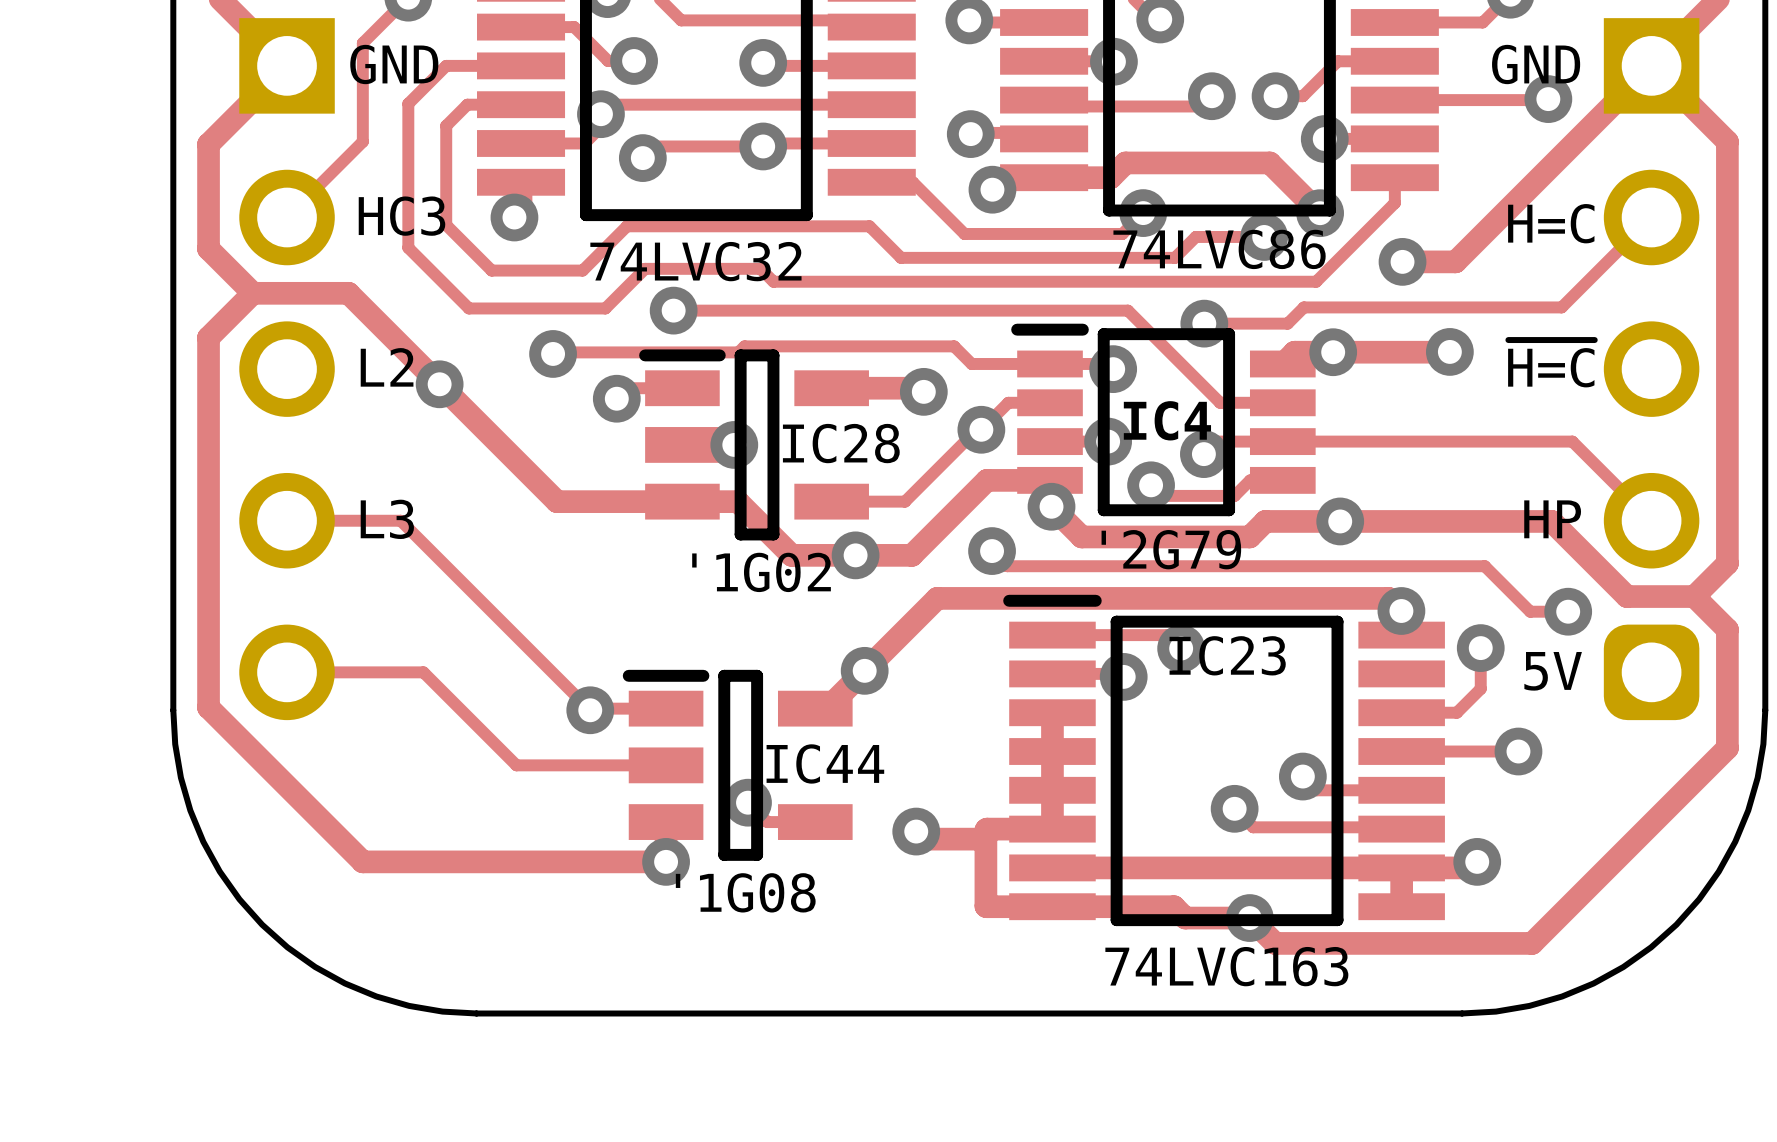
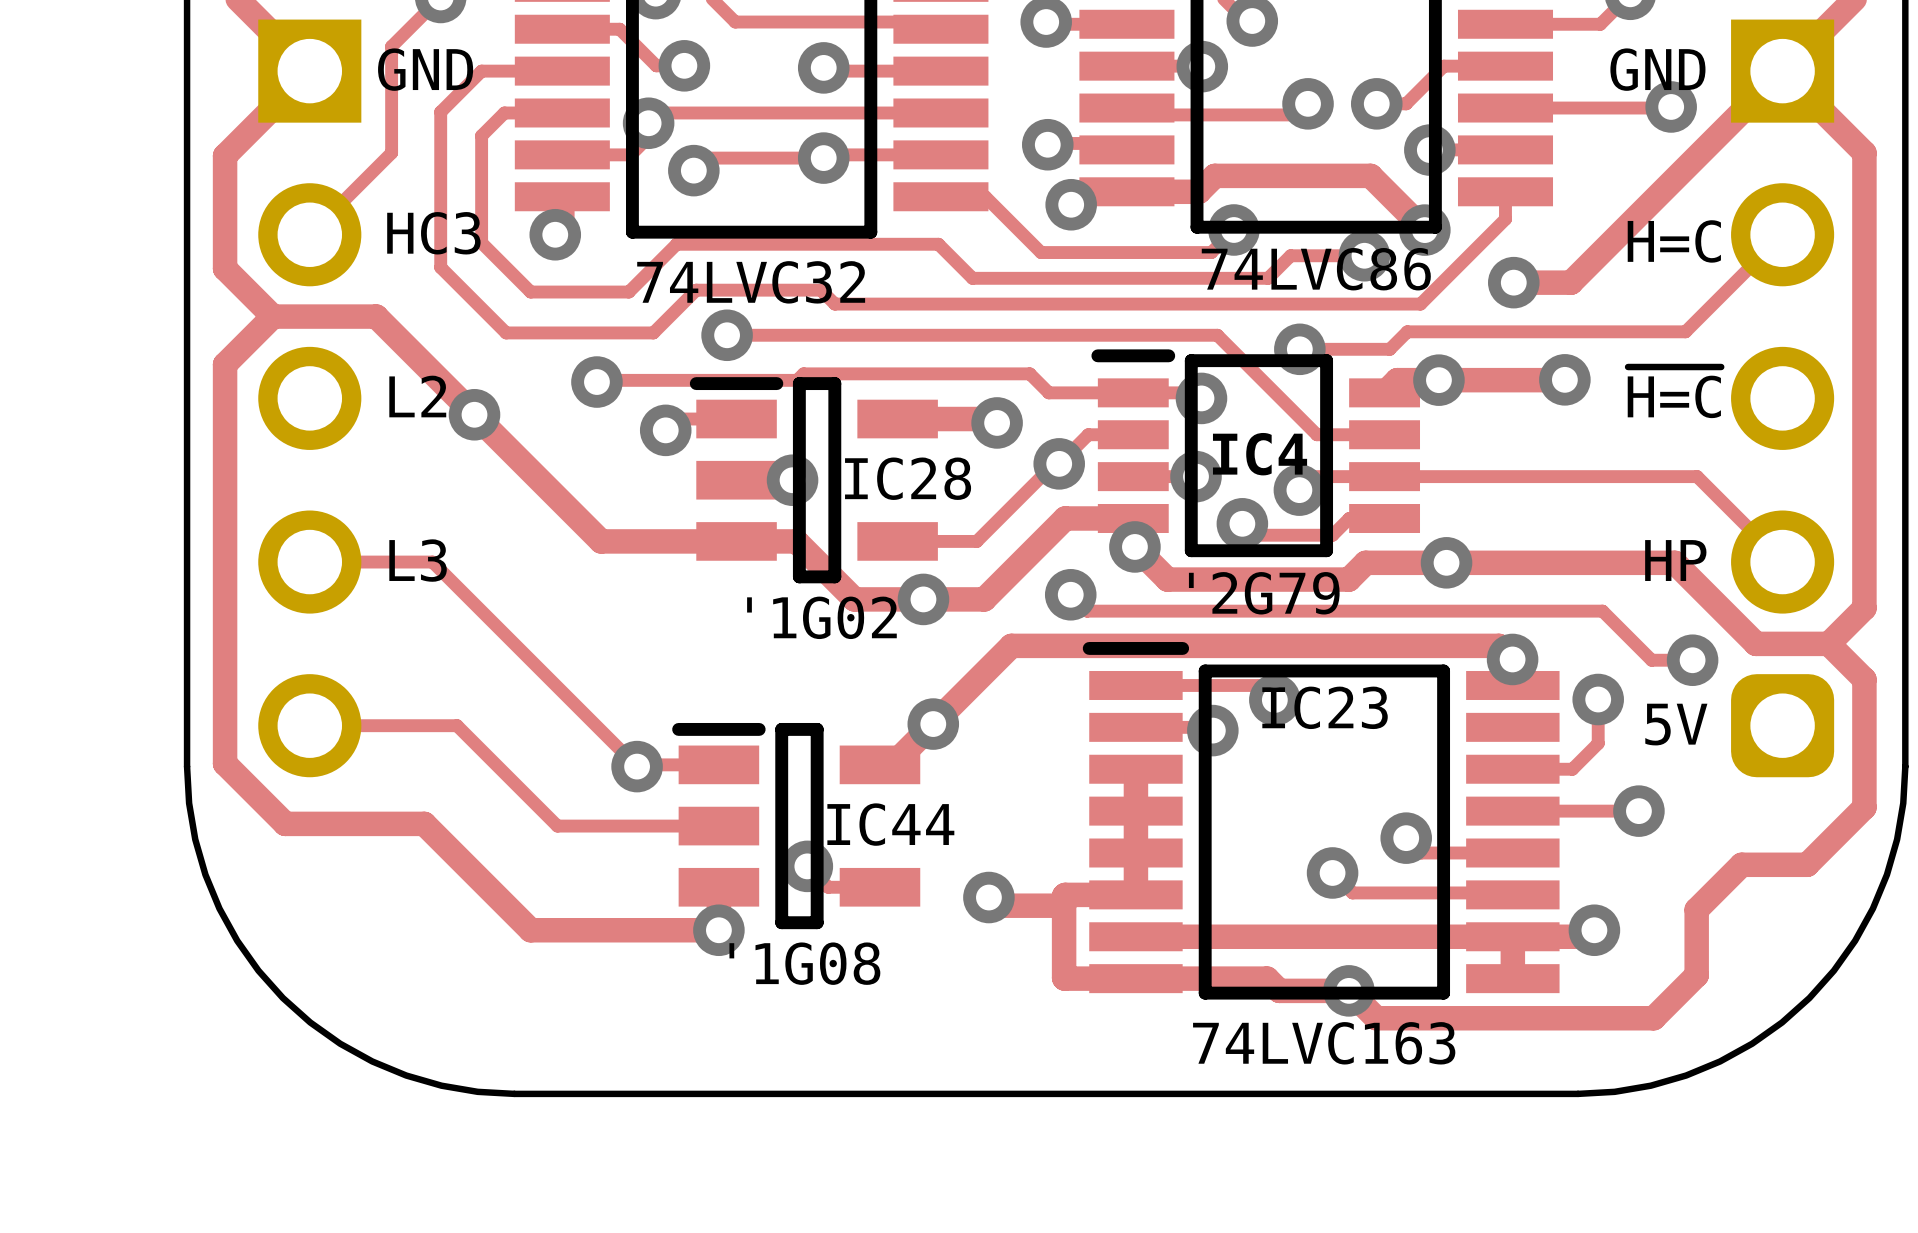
track: (264, 763) (362, 861) (491, 861) -> (285, 823) (424, 823) (530, 930)
track: (1674, 801) (1571, 903) -> (1807, 864) (1741, 864) (1696, 909) (1696, 975)

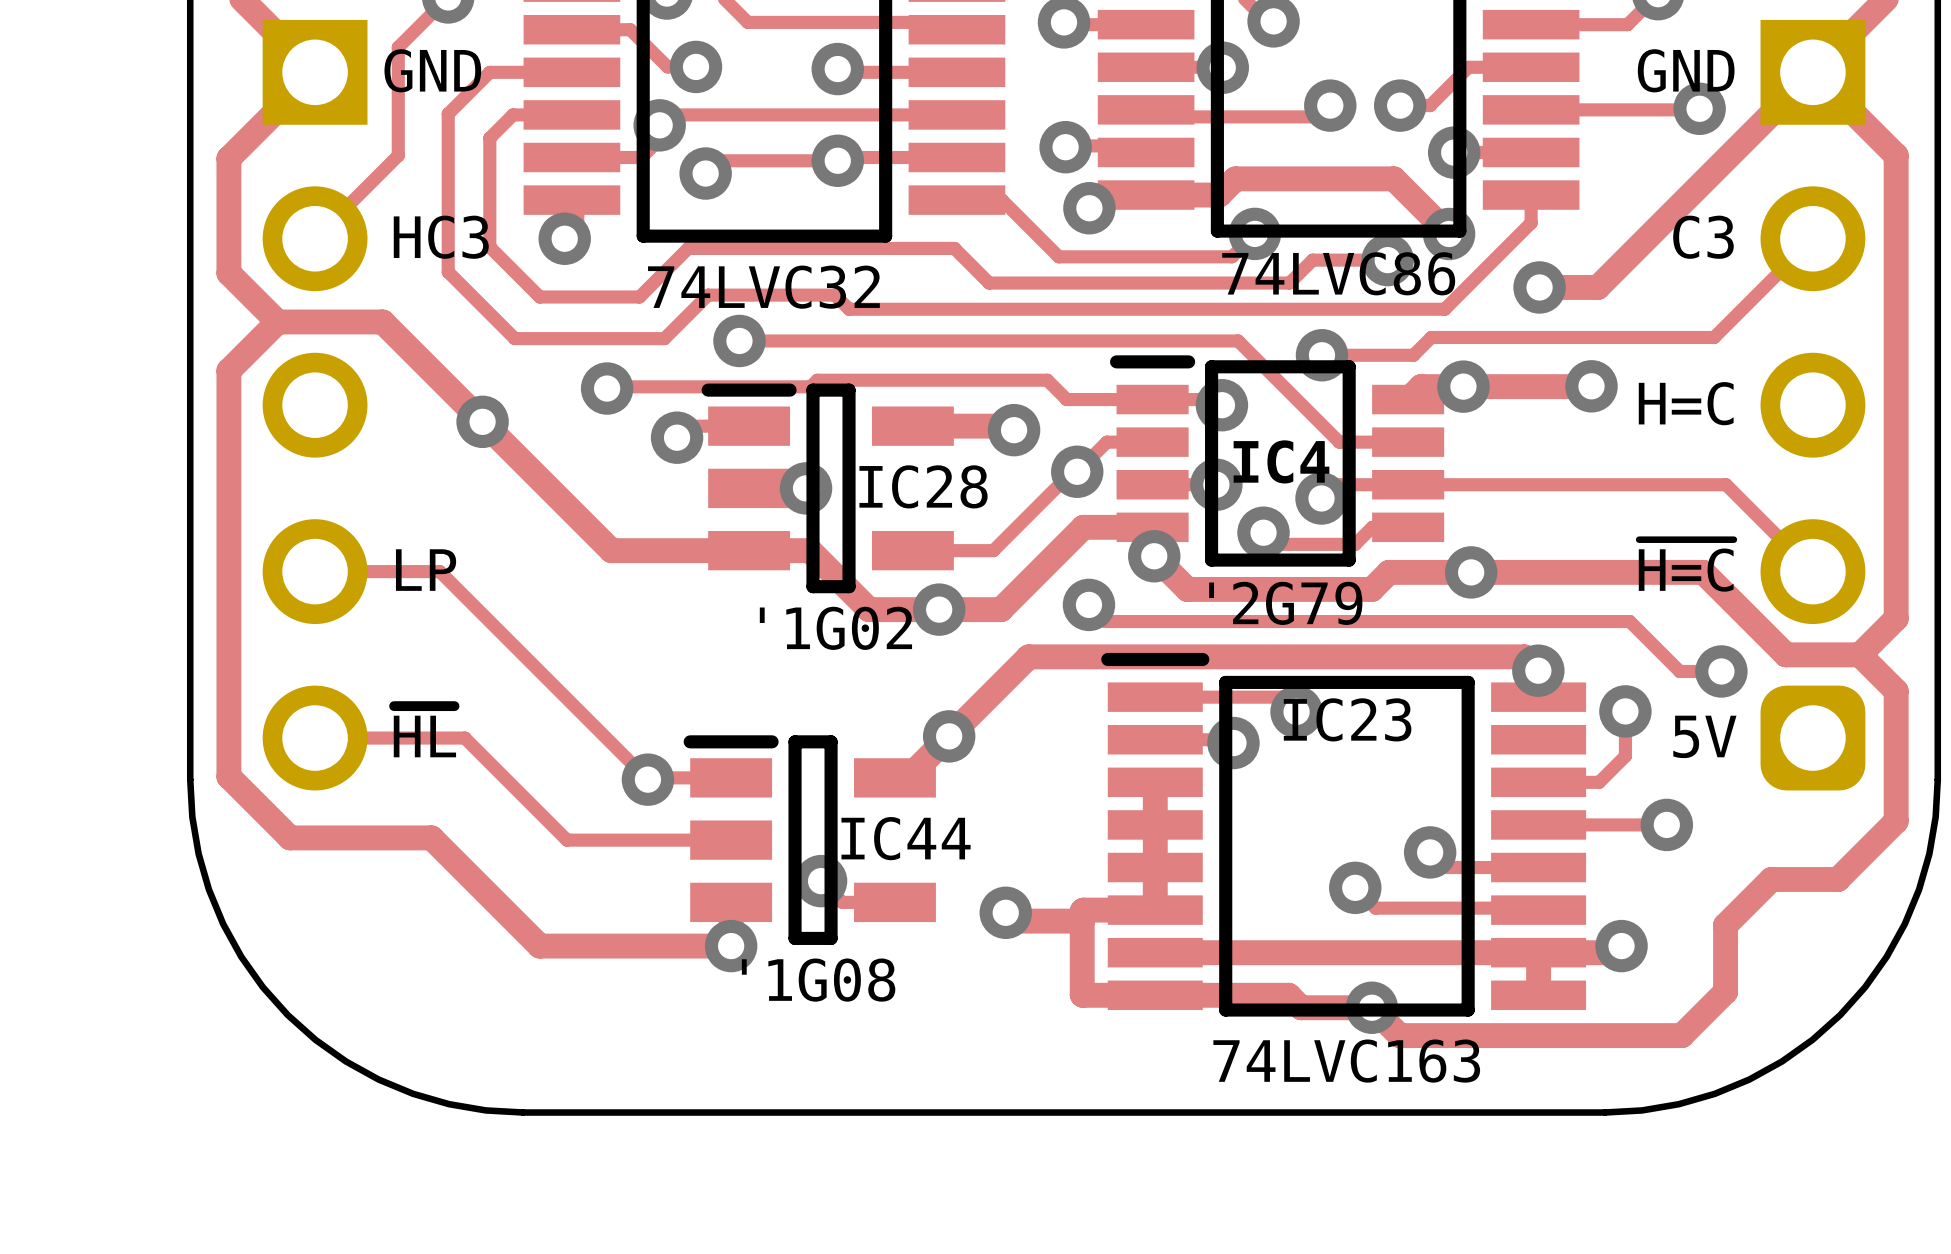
text: H=C (1674, 241) -> C3 (1703, 237)
text: ~{H=C} (1674, 392) -> H=C (1686, 403)
text: L2 (417, 396) -> none
text: L3 (418, 560) -> LP (426, 570)
text: HP (1675, 560) -> ~{H=C} (1686, 565)
text: none -> ~{HL} (424, 731)

